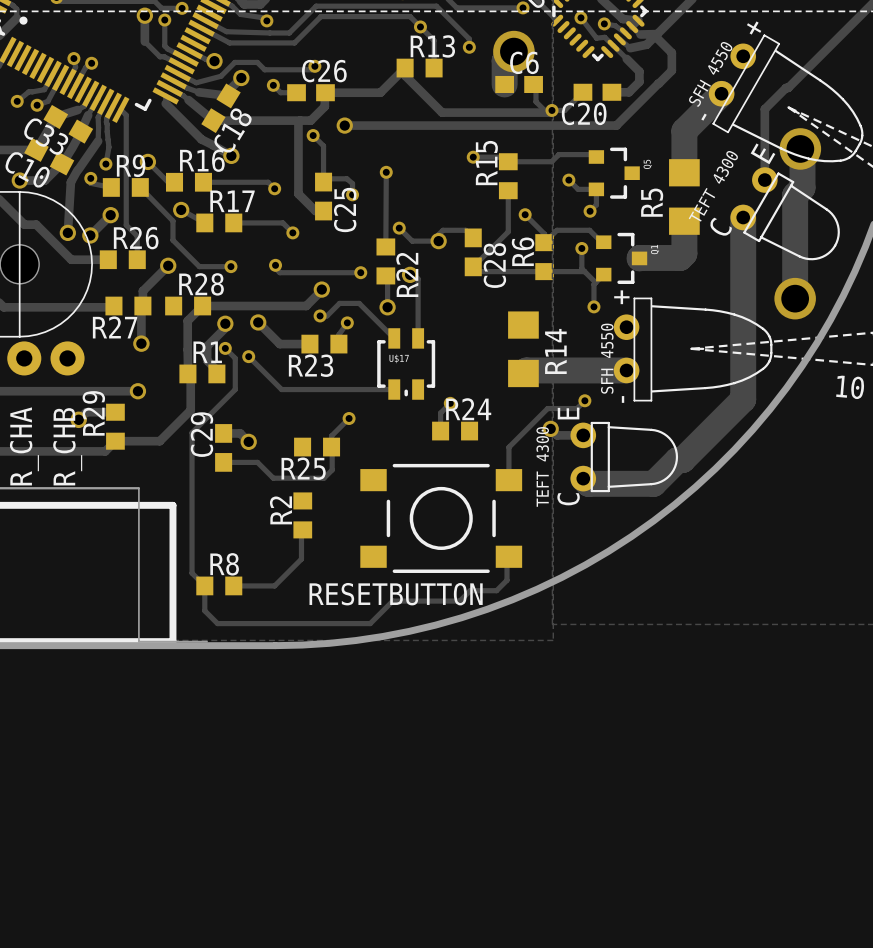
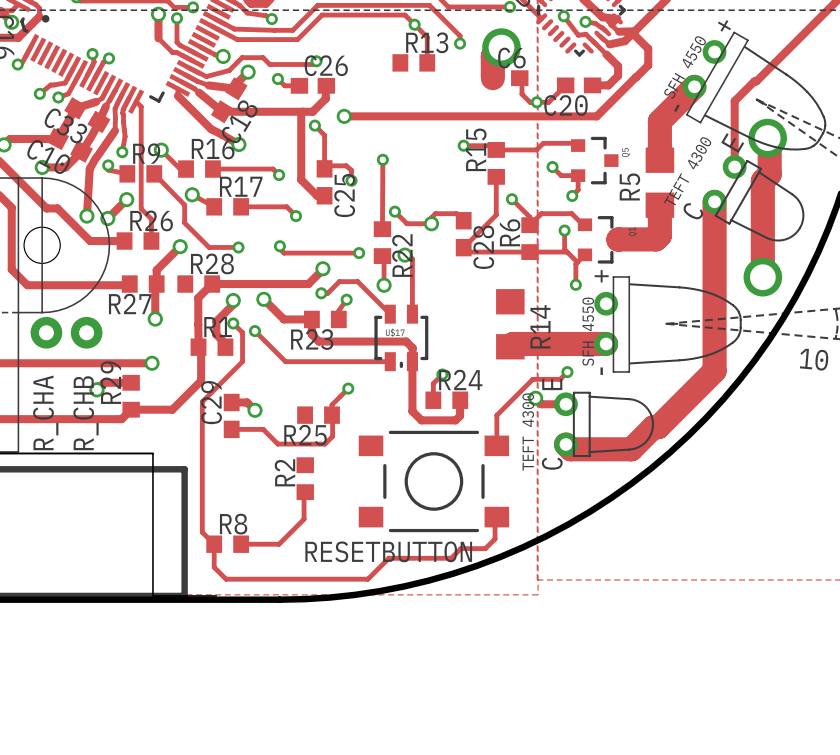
track: (325, 92) (380, 92) (405, 68) (405, 75) (442, 112) (549, 112) (551, 110) -> none
track: none -> (311, 319) (311, 334) (318, 341) (406, 341) (412, 347) (412, 361)
track: none -> (412, 361) (412, 411) (421, 420) (455, 420) (460, 415) (460, 400)

